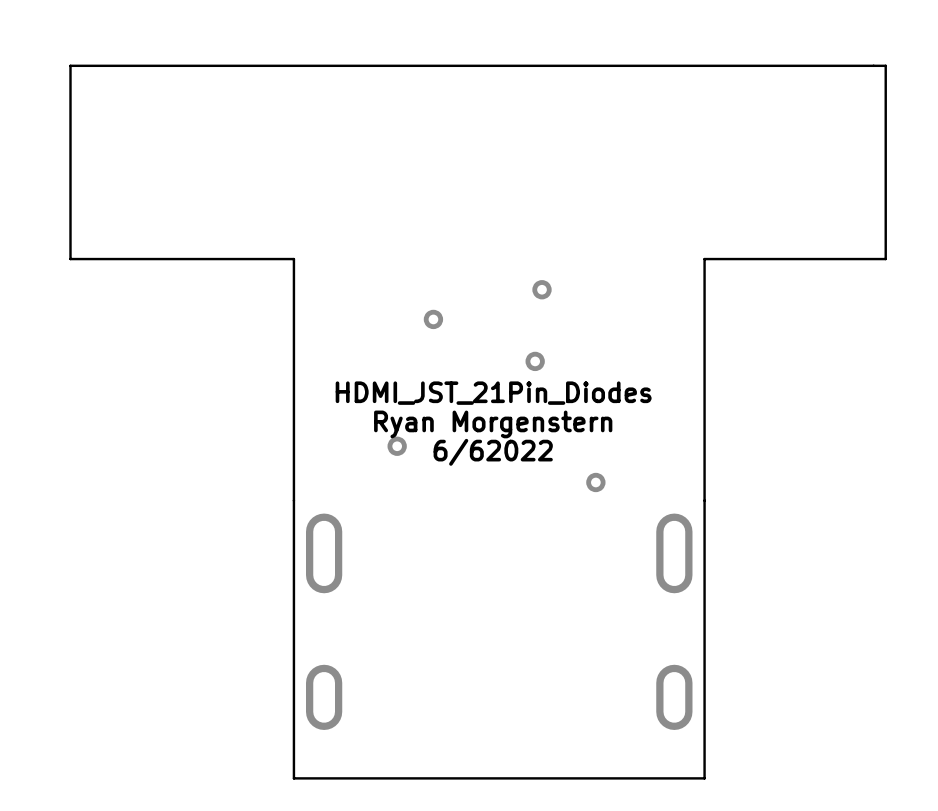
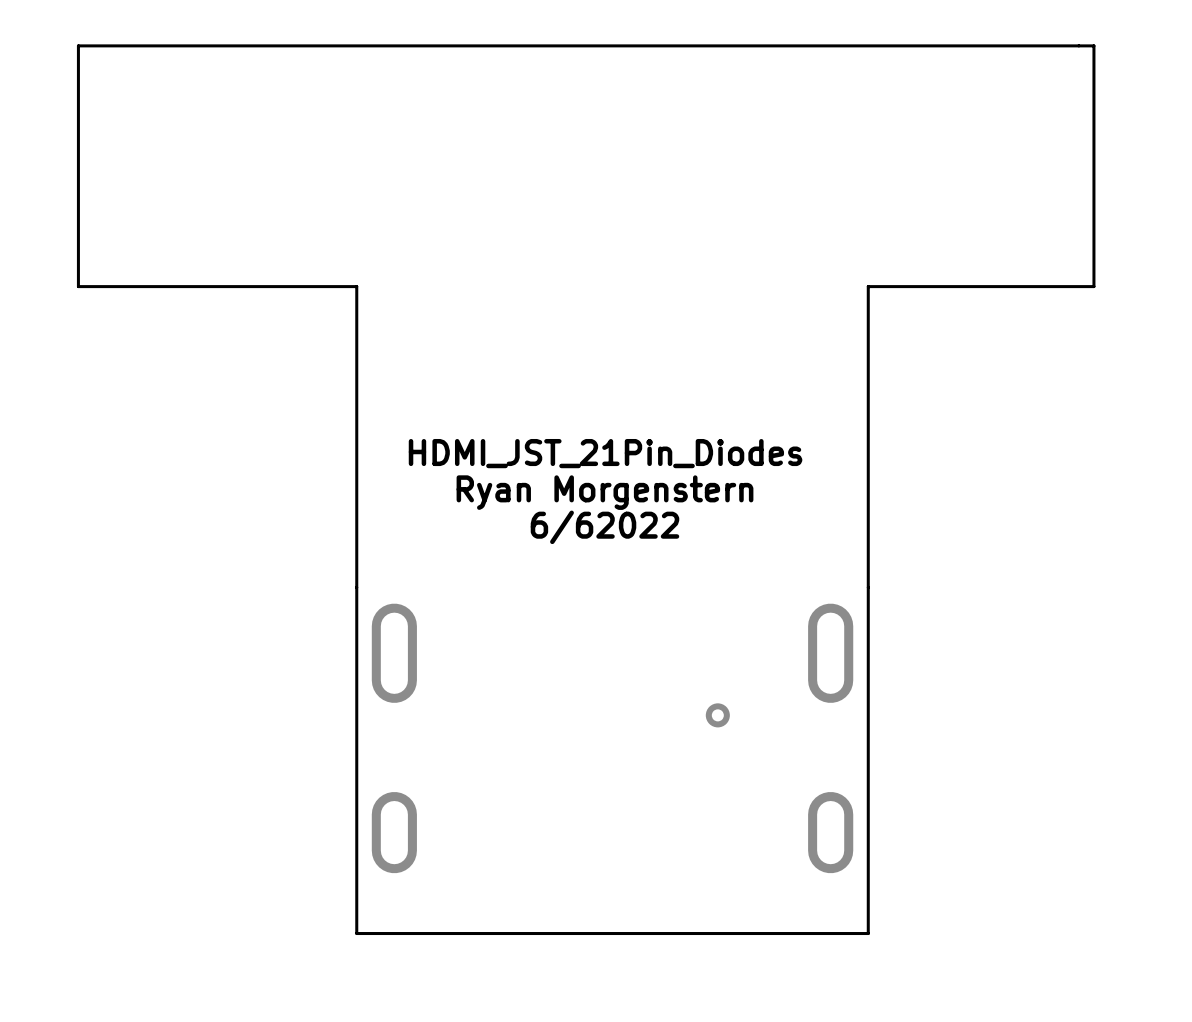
via: (542, 289) -> none
via: (433, 319) -> none
via: (535, 361) -> none
via: (397, 446) -> none
via position: (595, 482) -> (717, 715)

